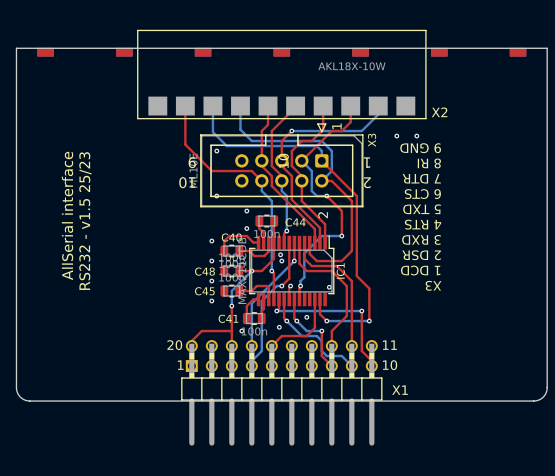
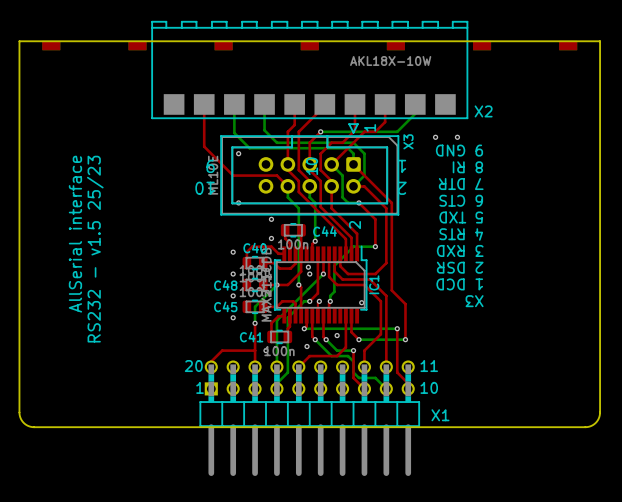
X2 footprint: [137, 29, 427, 120] -> [151, 21, 468, 119]

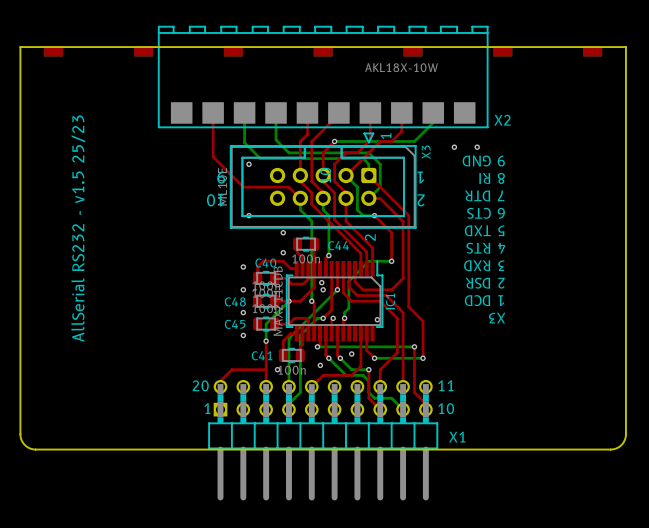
text: AllSerial interface (75, 234) -> none
text: RS232 - v1.5 25/23 (95, 249) -> AllSerial RS232 - v1.5 25/23 (78, 228)

